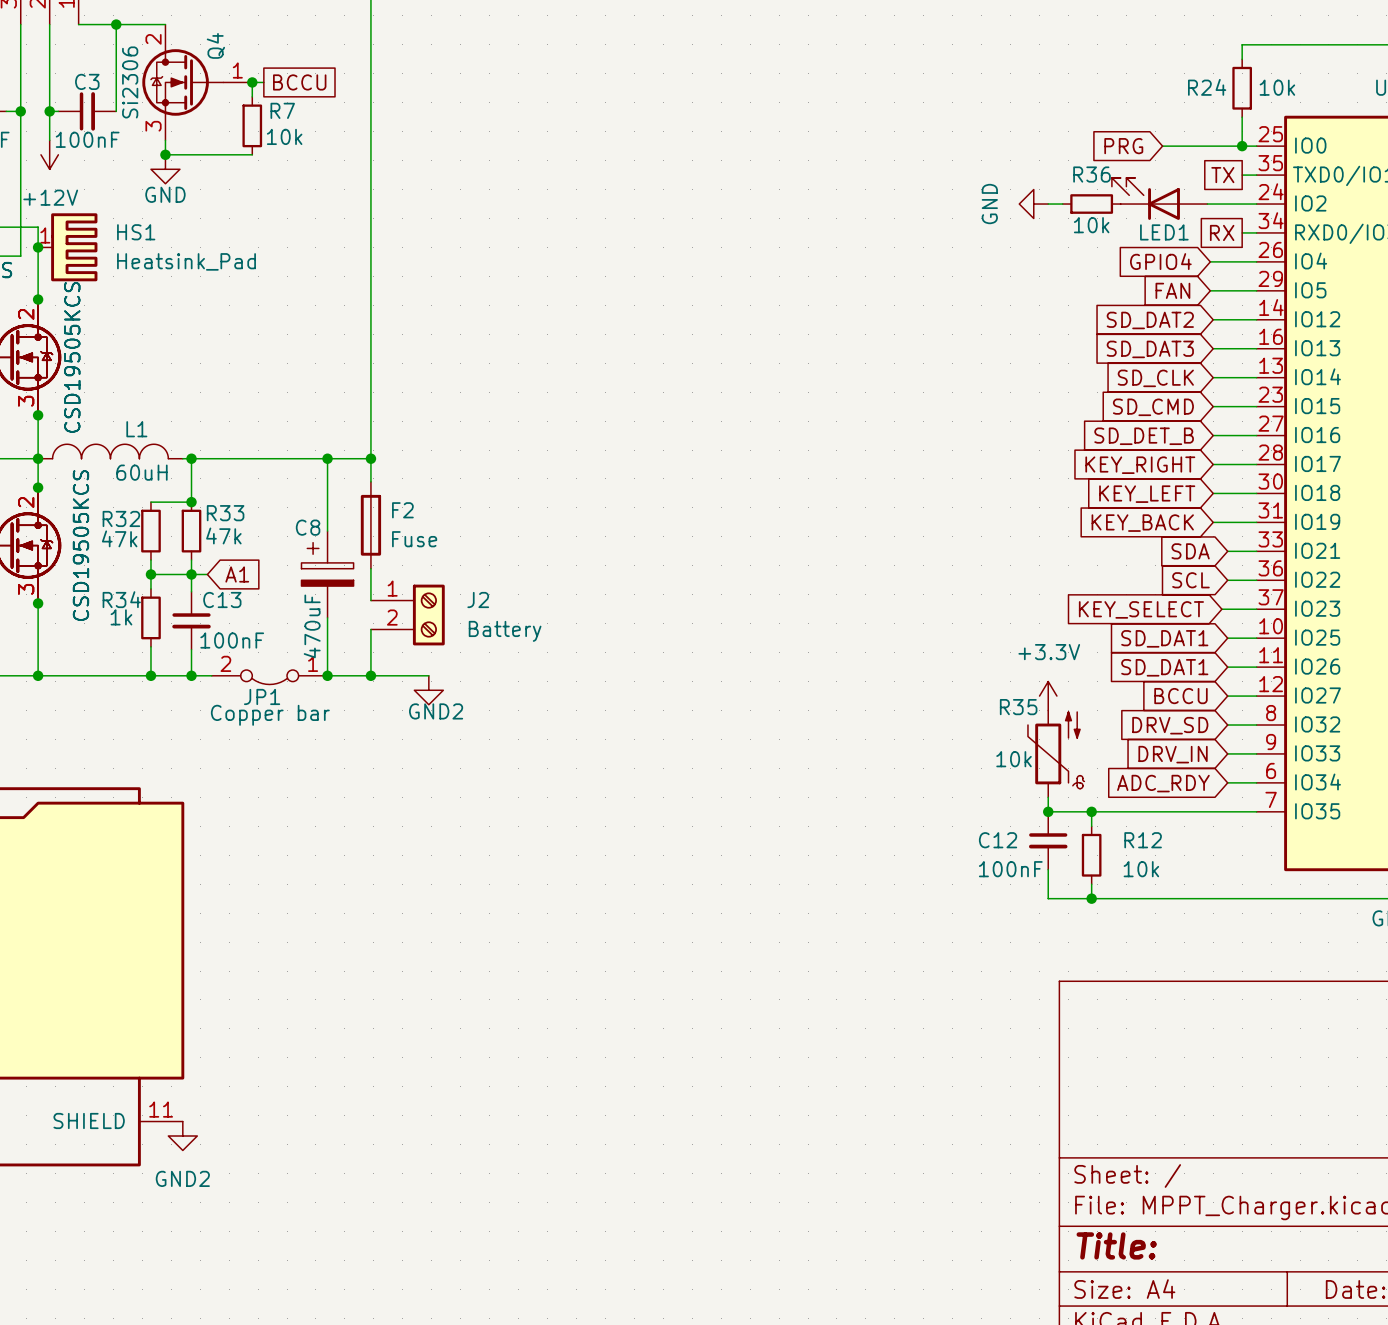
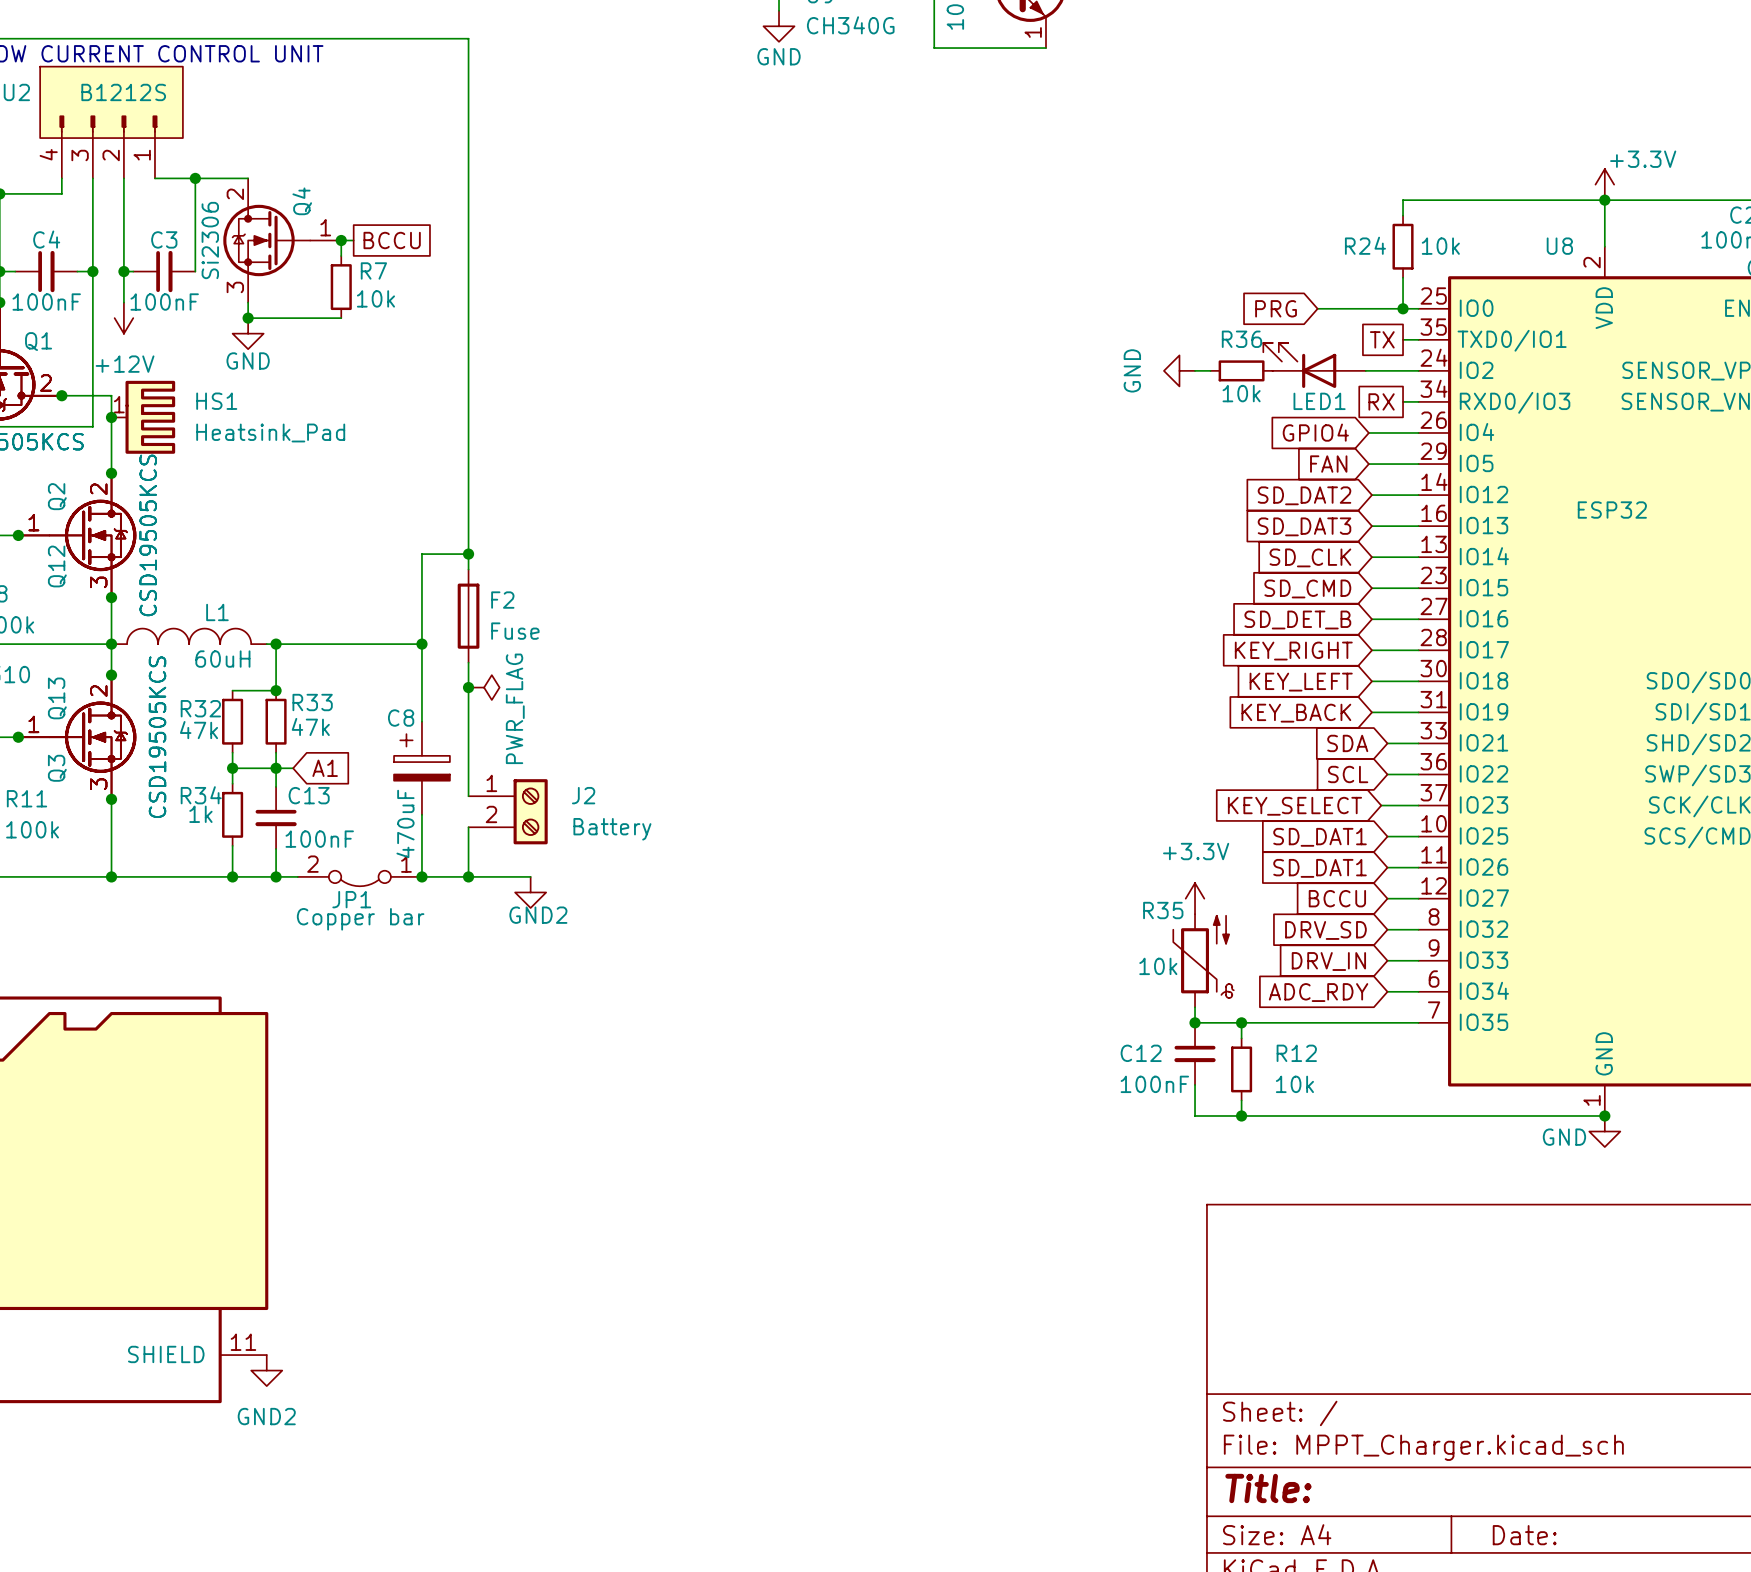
junction: none -> (468, 554)
wire: (327, 458) (370, 458) -> (421, 644) (421, 554) (468, 554)
junction position: (370, 458) -> (468, 687)
power symbol: none -> PWR_FLAG (484, 687)
F2 position: (370, 525) -> (468, 616)

